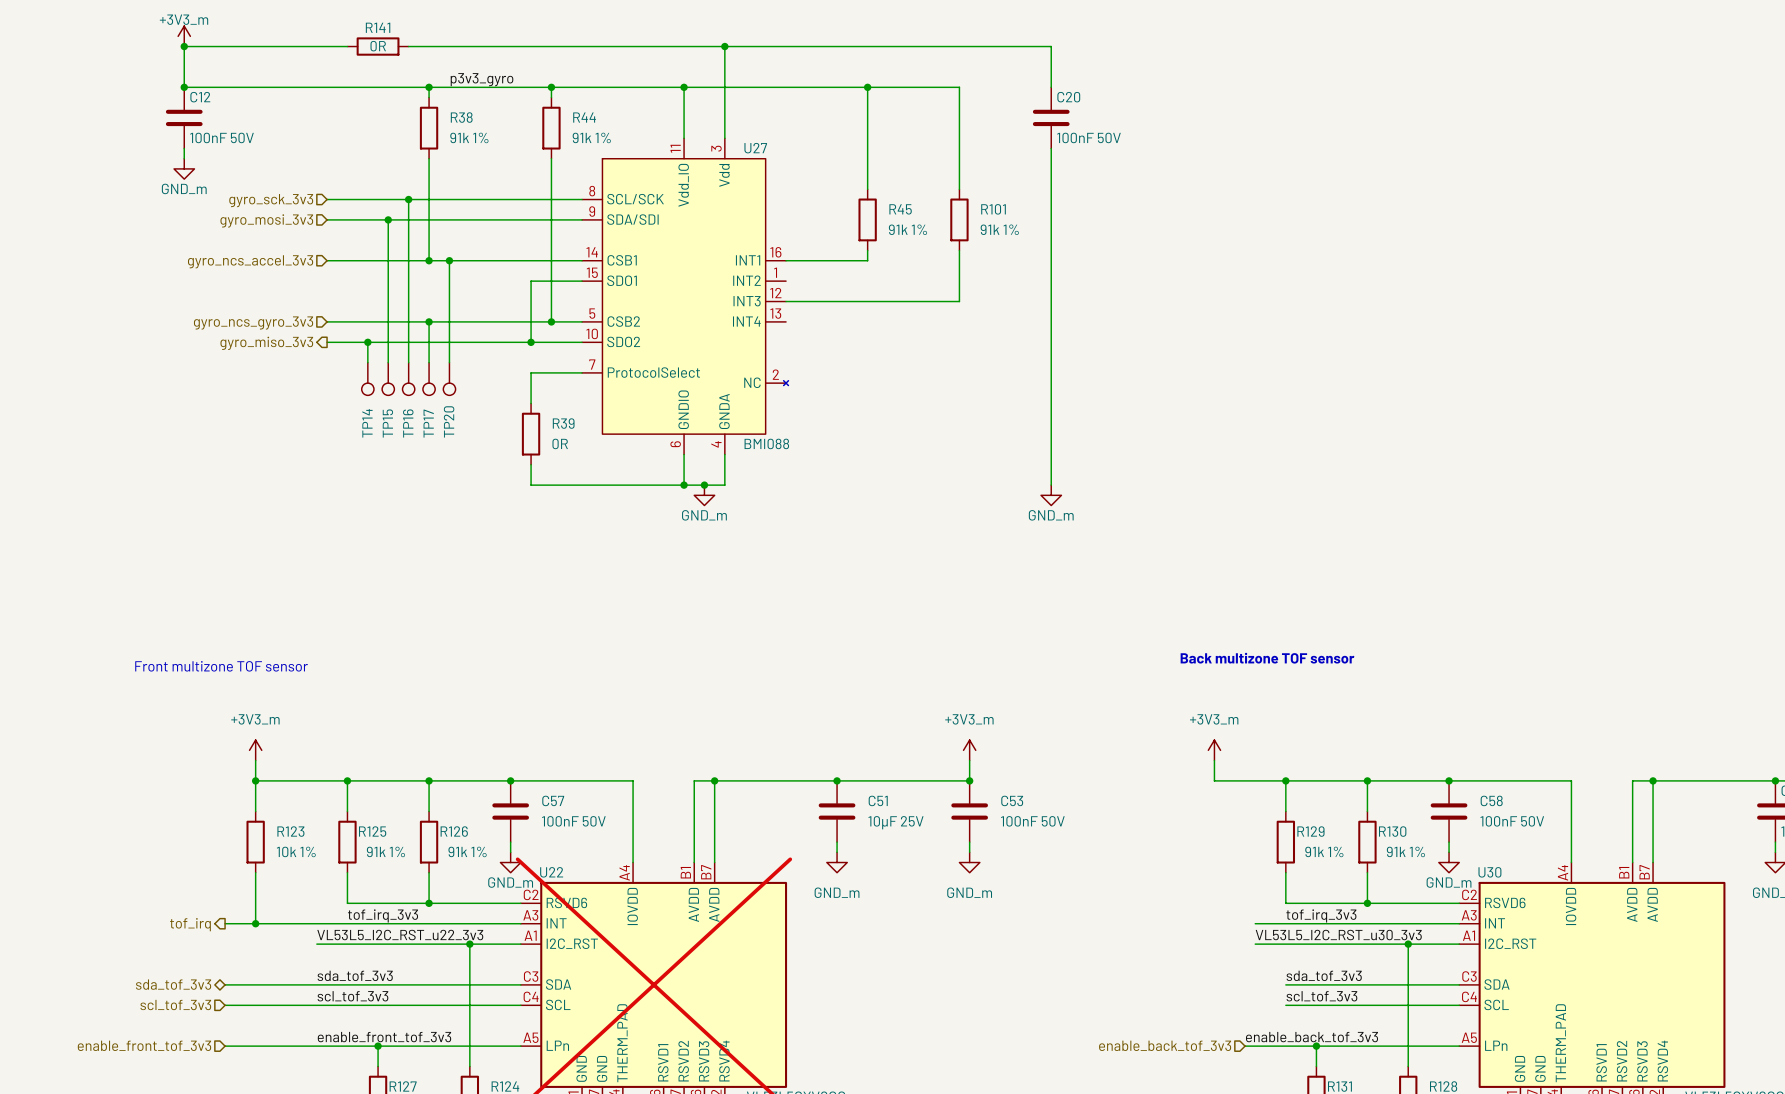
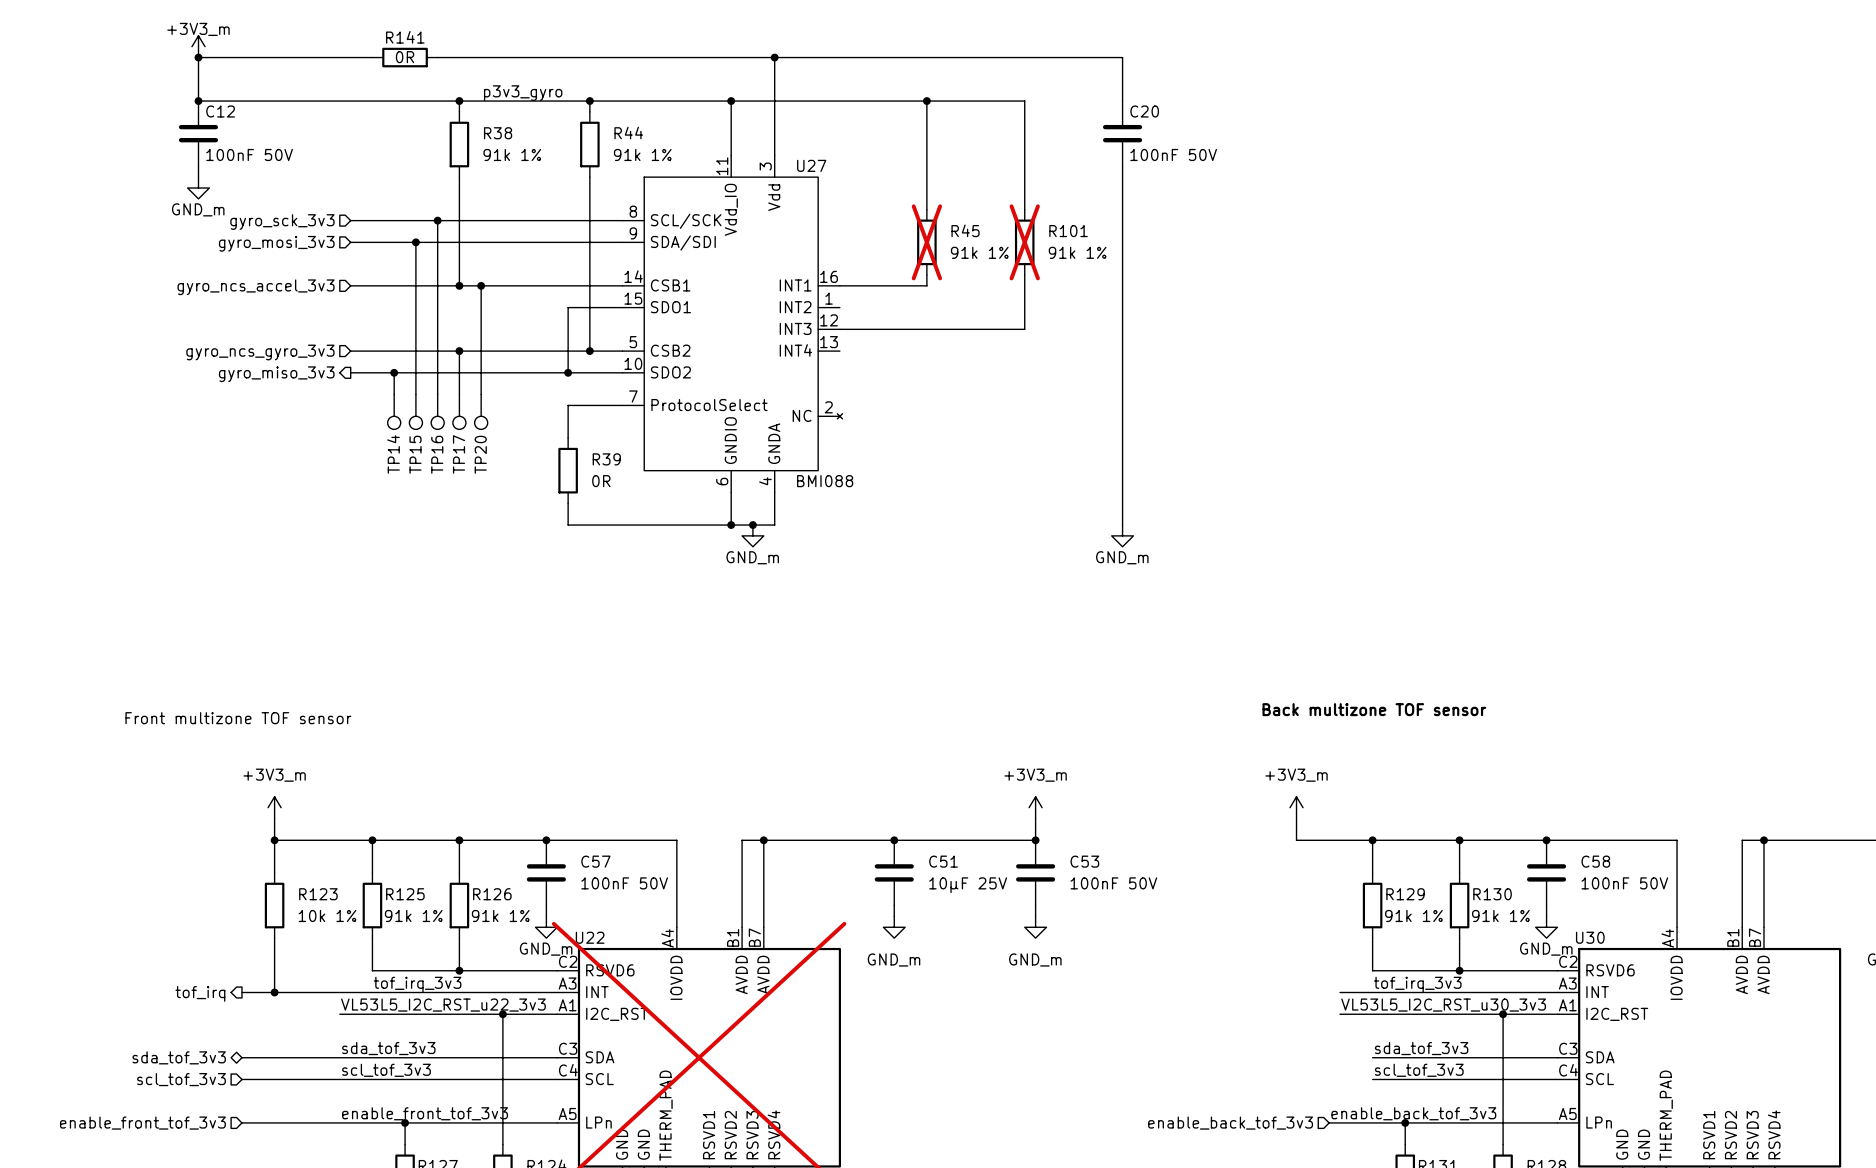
R45 do-not-place cross: none -> (926, 242)
R101 do-not-place cross: none -> (1024, 242)

